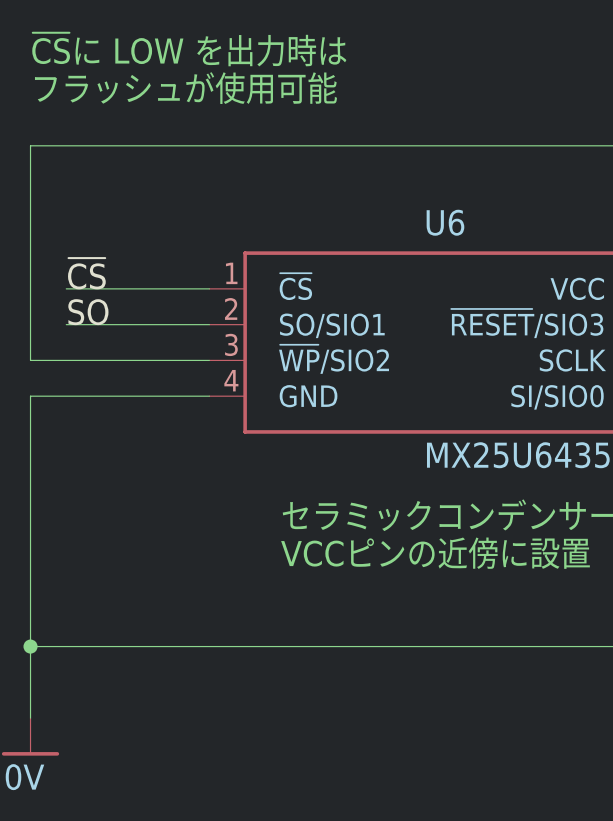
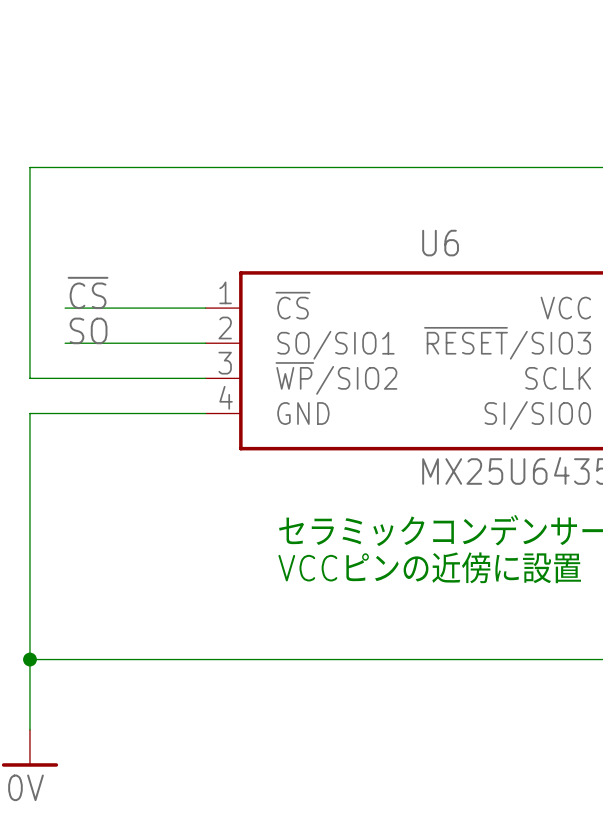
text: ~{CS}に LOW を出力時は (189, 49) -> none
text: フラッシュが使用可能 (185, 88) -> none

